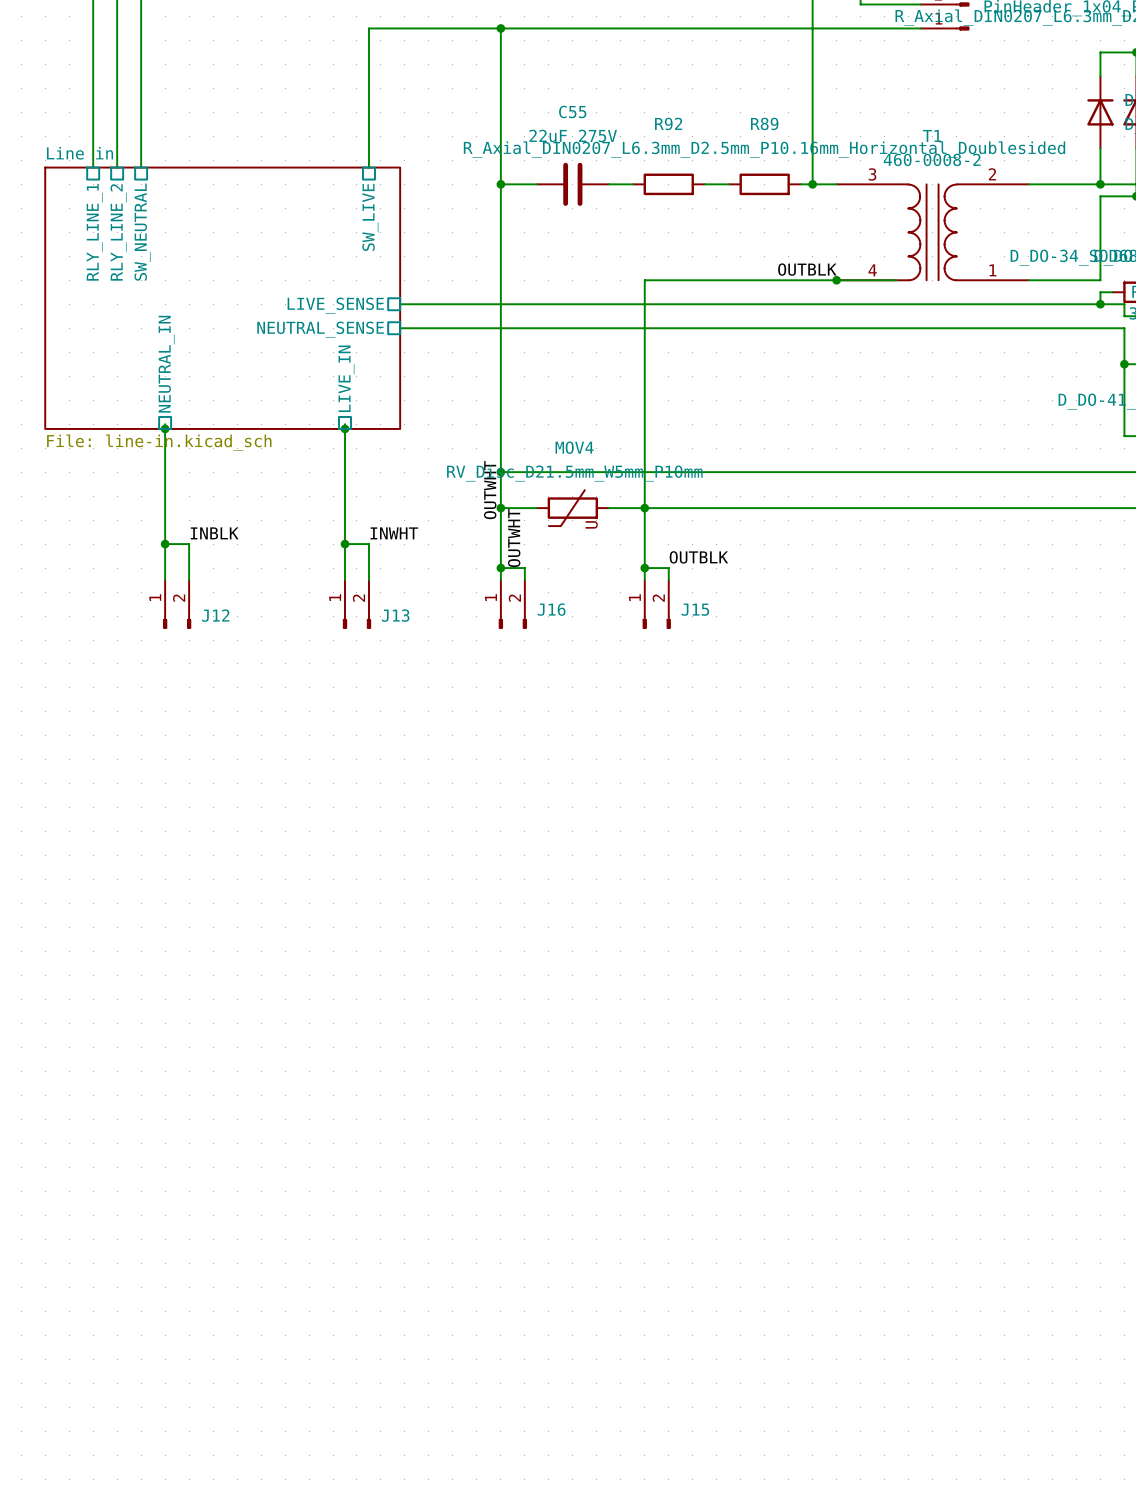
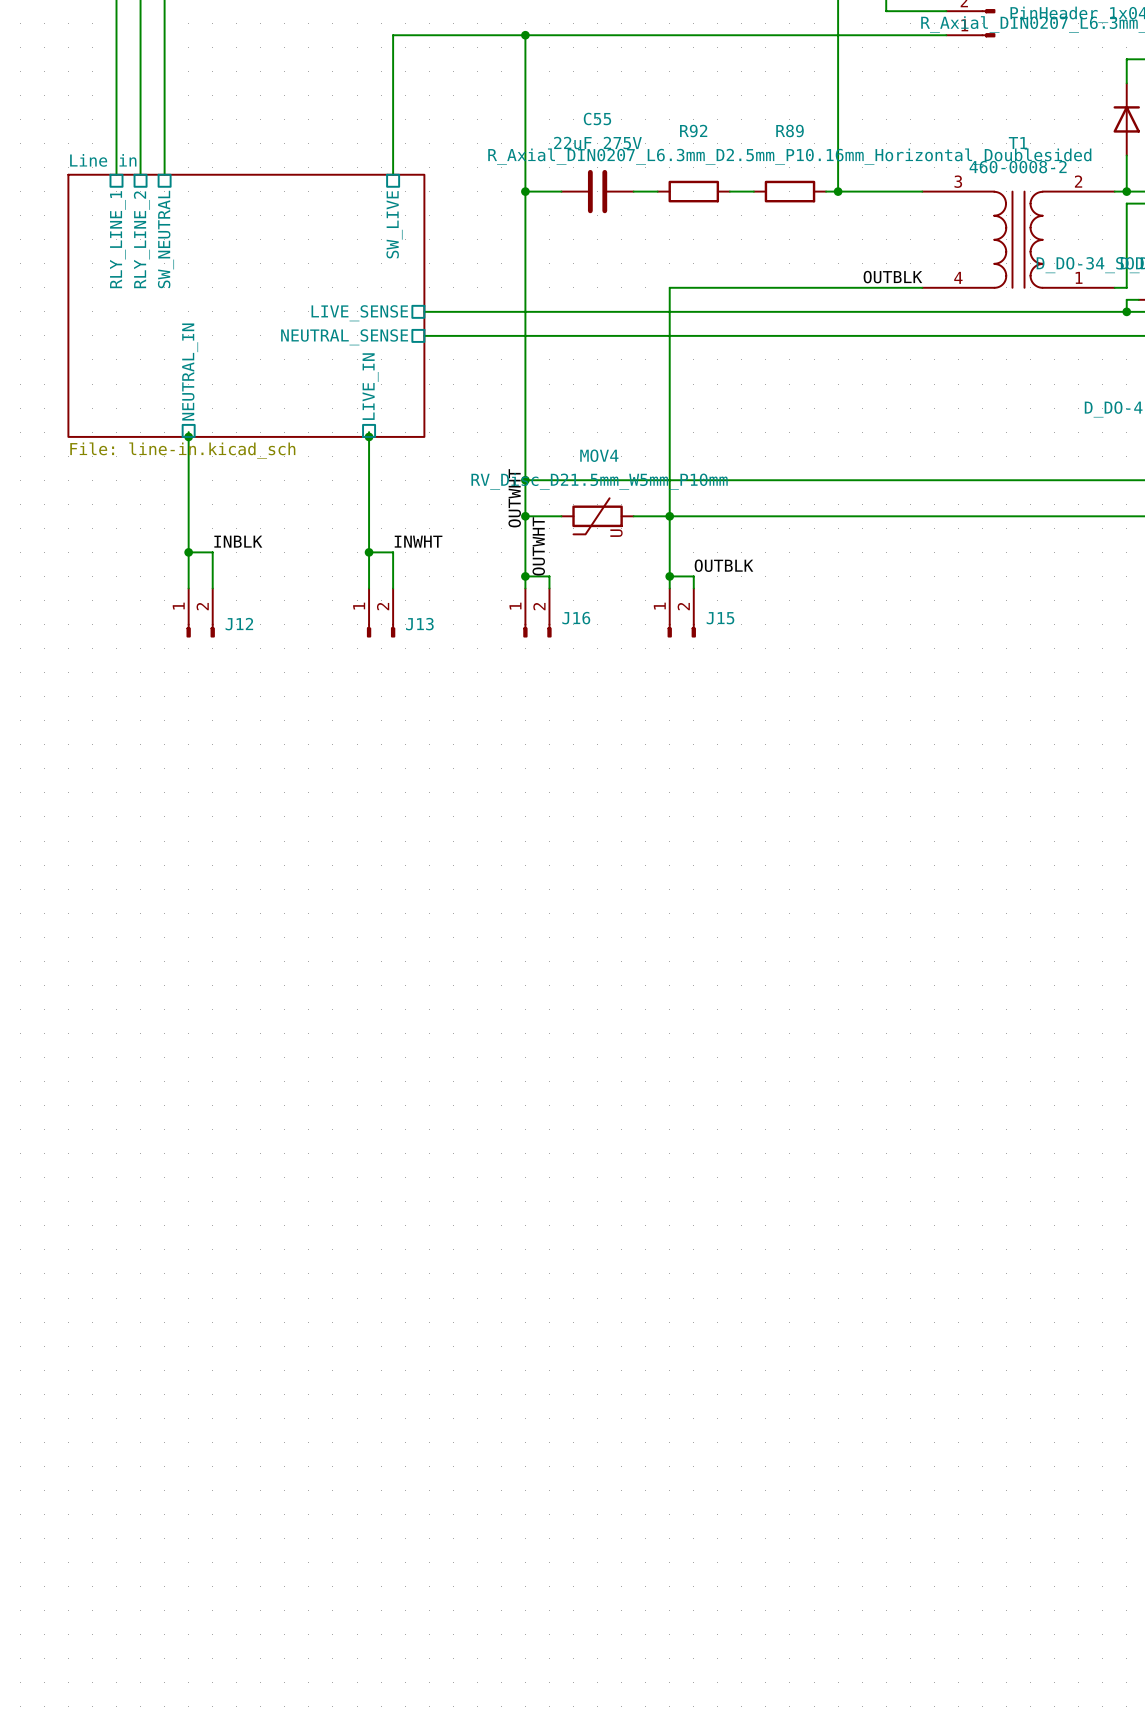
T1 position: (932, 232) -> (1018, 239)
label position: OUTBLK (807, 269) -> OUTBLK (892, 277)
junction: (836, 280) -> none

